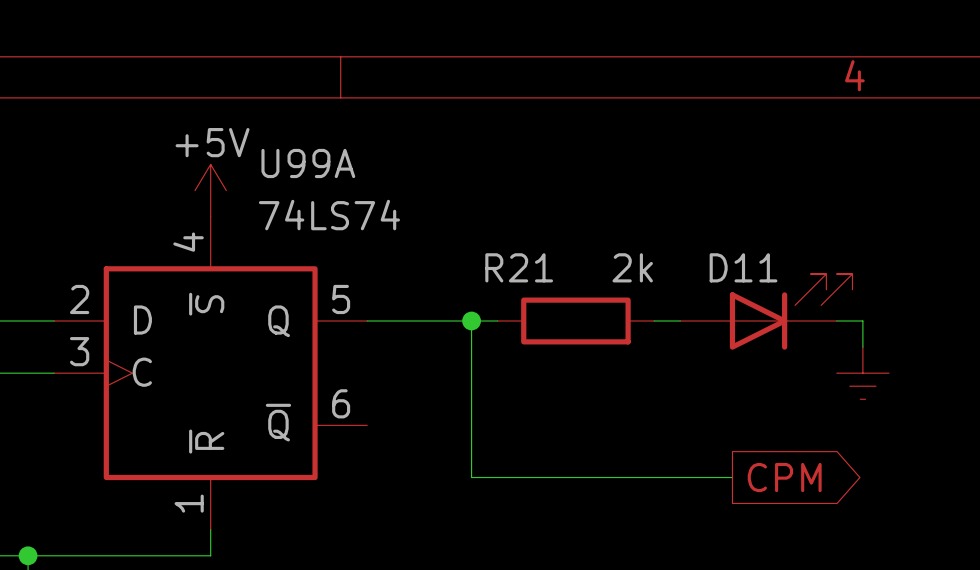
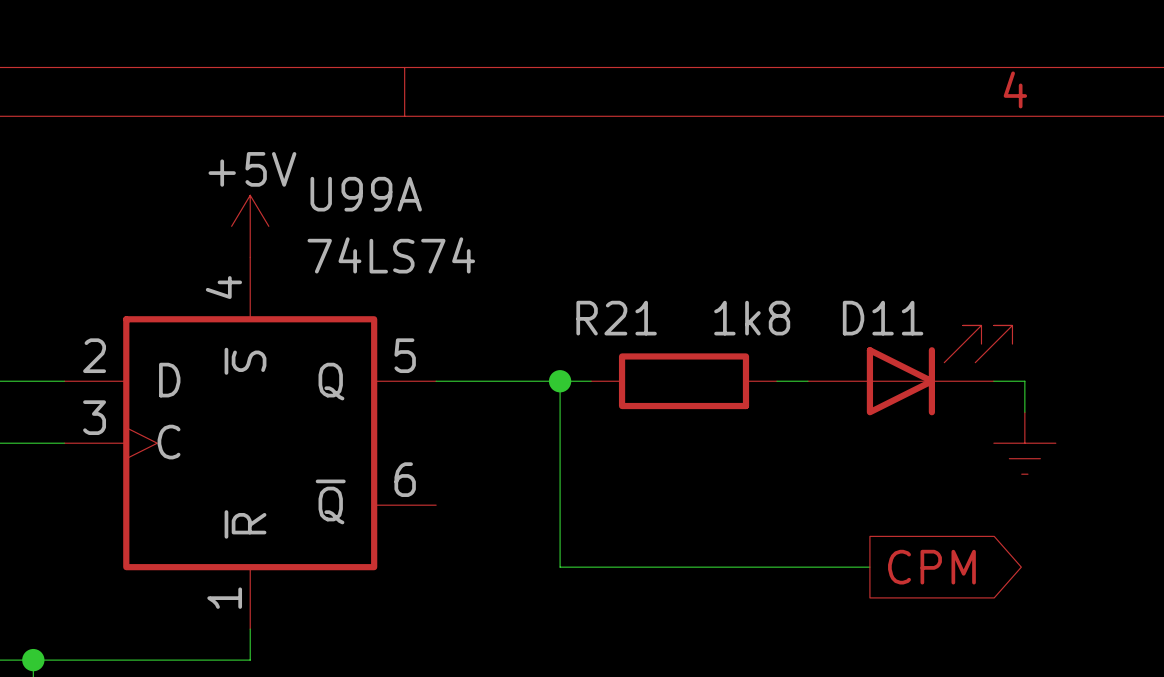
R21 value: 2k (632, 267) -> 1k8 (752, 318)

